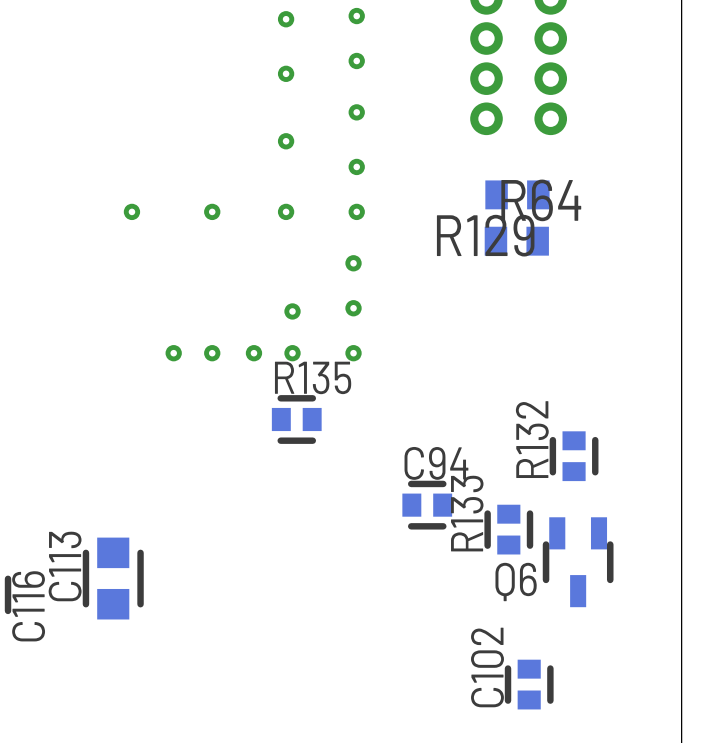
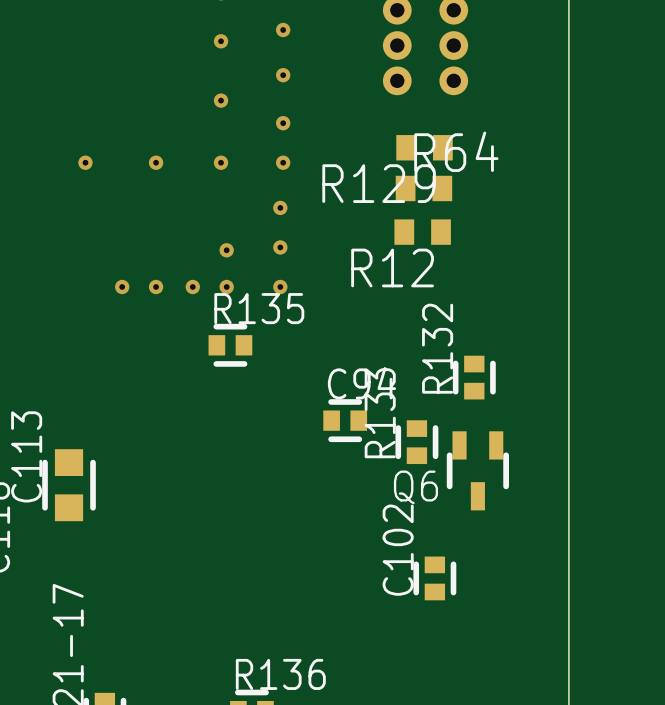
R12: none -> (422, 232)

